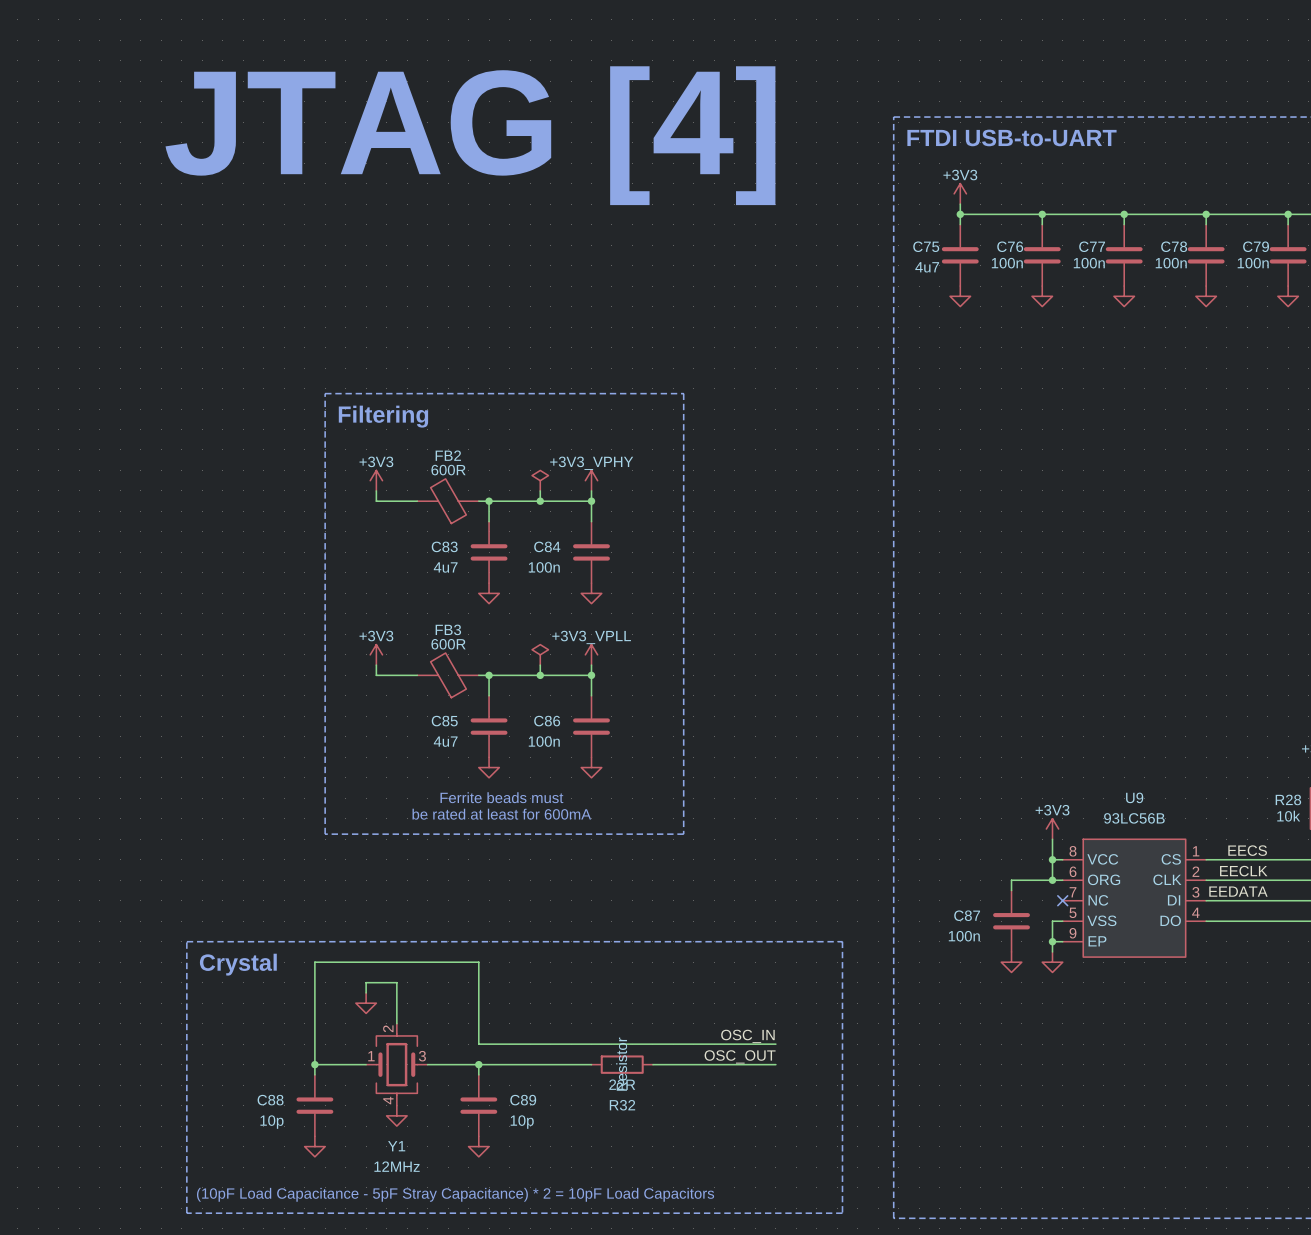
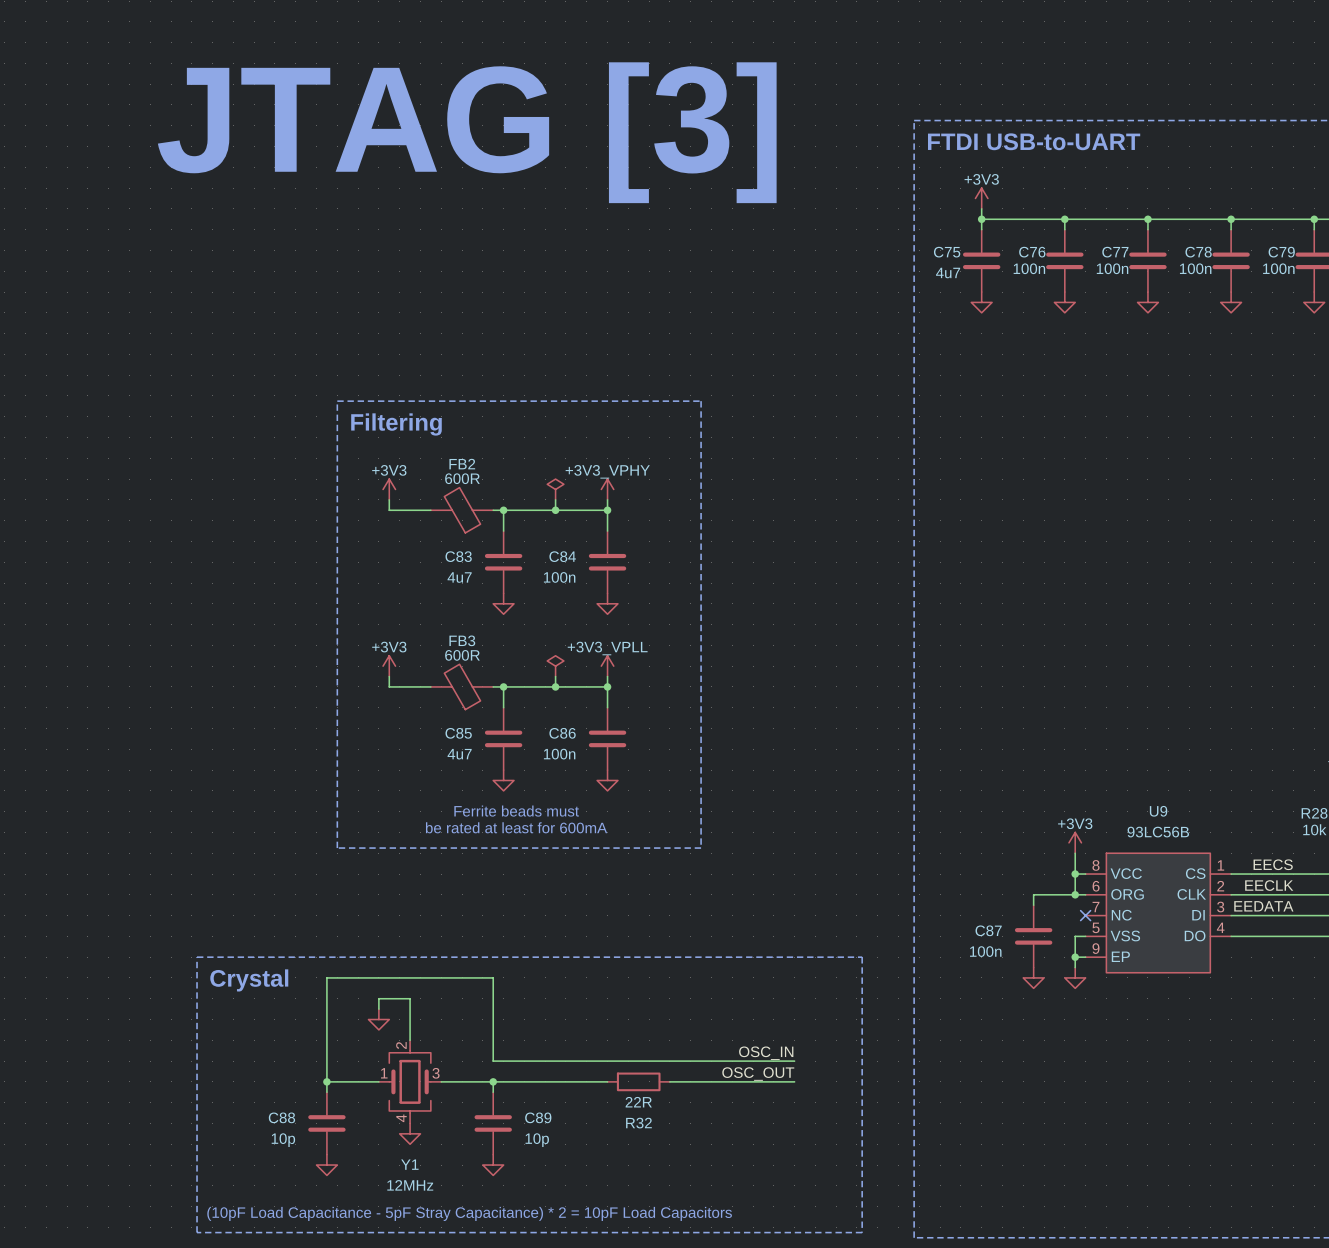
text: none -> JTAG [3] (467, 132)
text: JTAG [4] (470, 135) -> none
R32 text: Resistor (621, 1064) -> none

